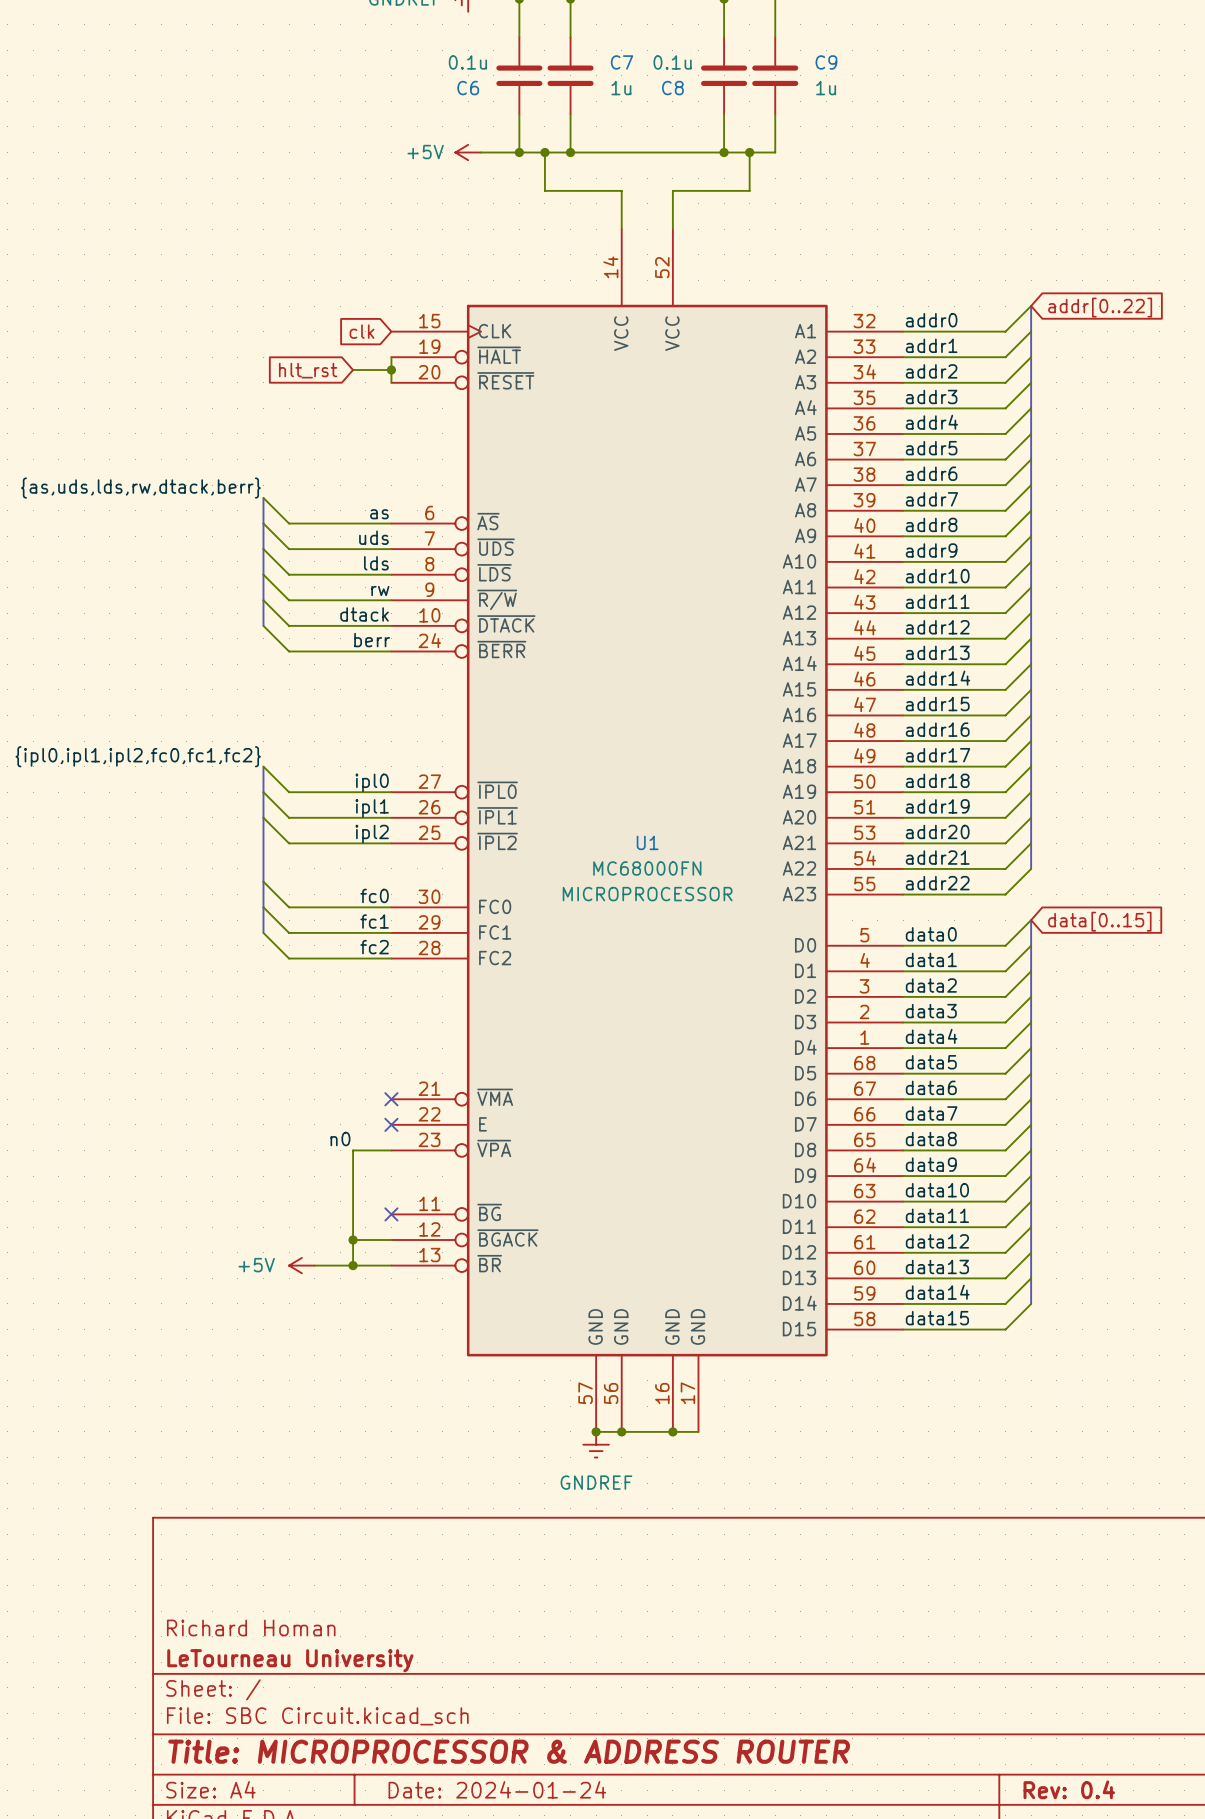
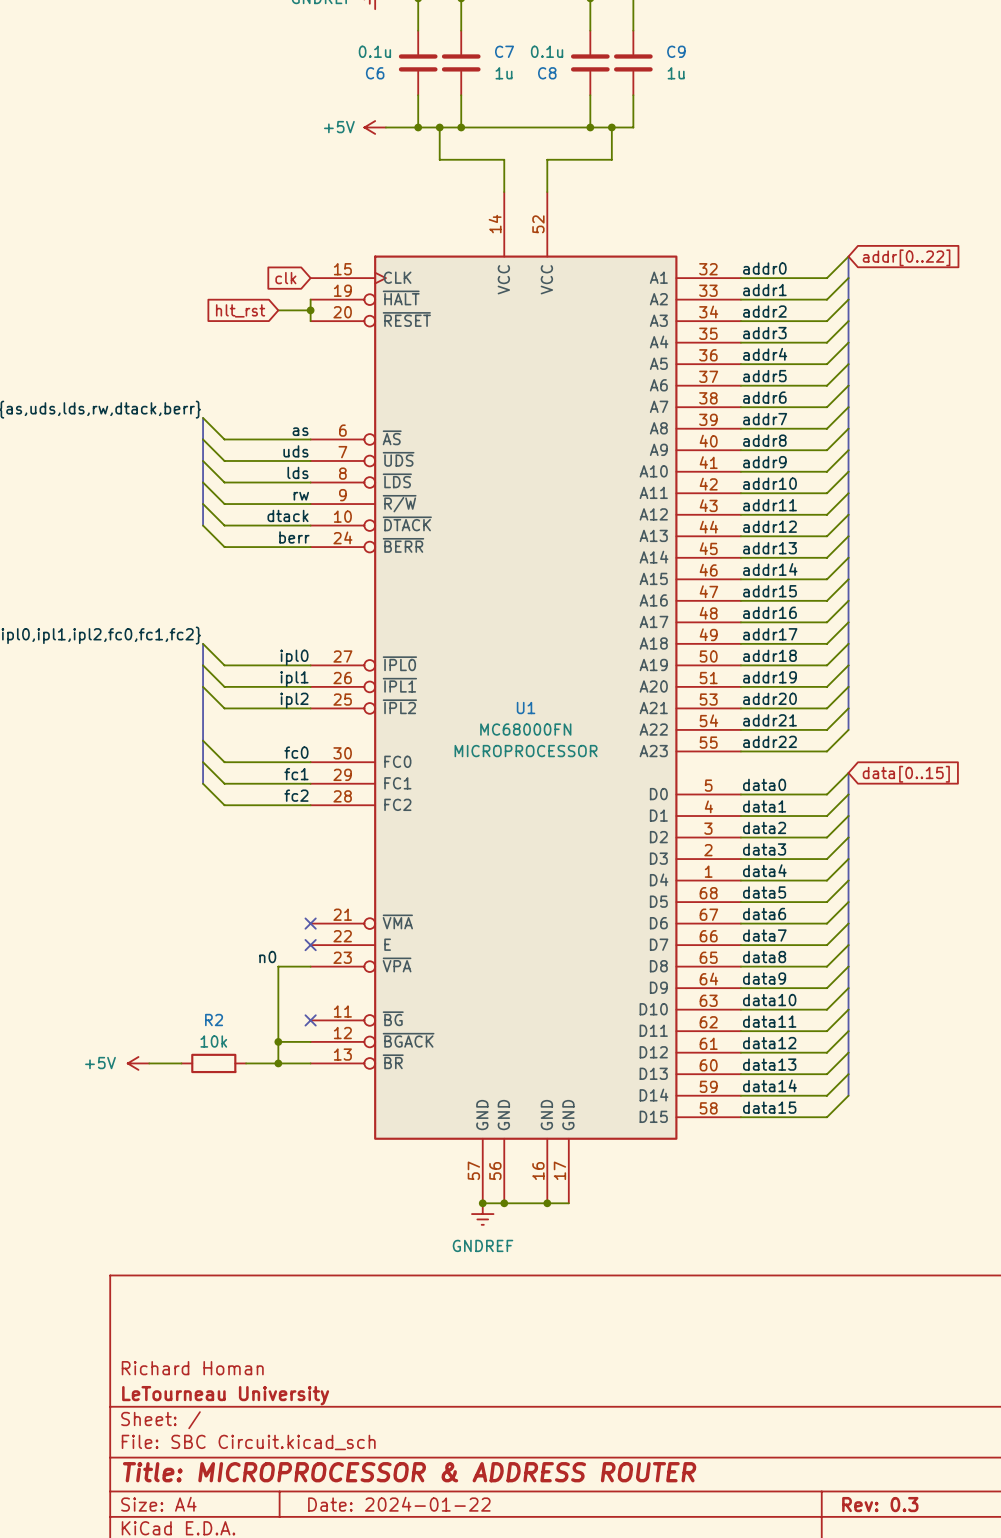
wire: none -> (149, 1063) (181, 1063)
R2: none -> 10k (213, 1063)
power symbol position: +5V (301, 1265) -> +5V (138, 1063)
title block: Date: 2024-01-24 (497, 1789) -> Date: 2024-01-22 (399, 1504)
title block: Rev: 0.4 (1069, 1789) -> Rev: 0.3 (880, 1504)

